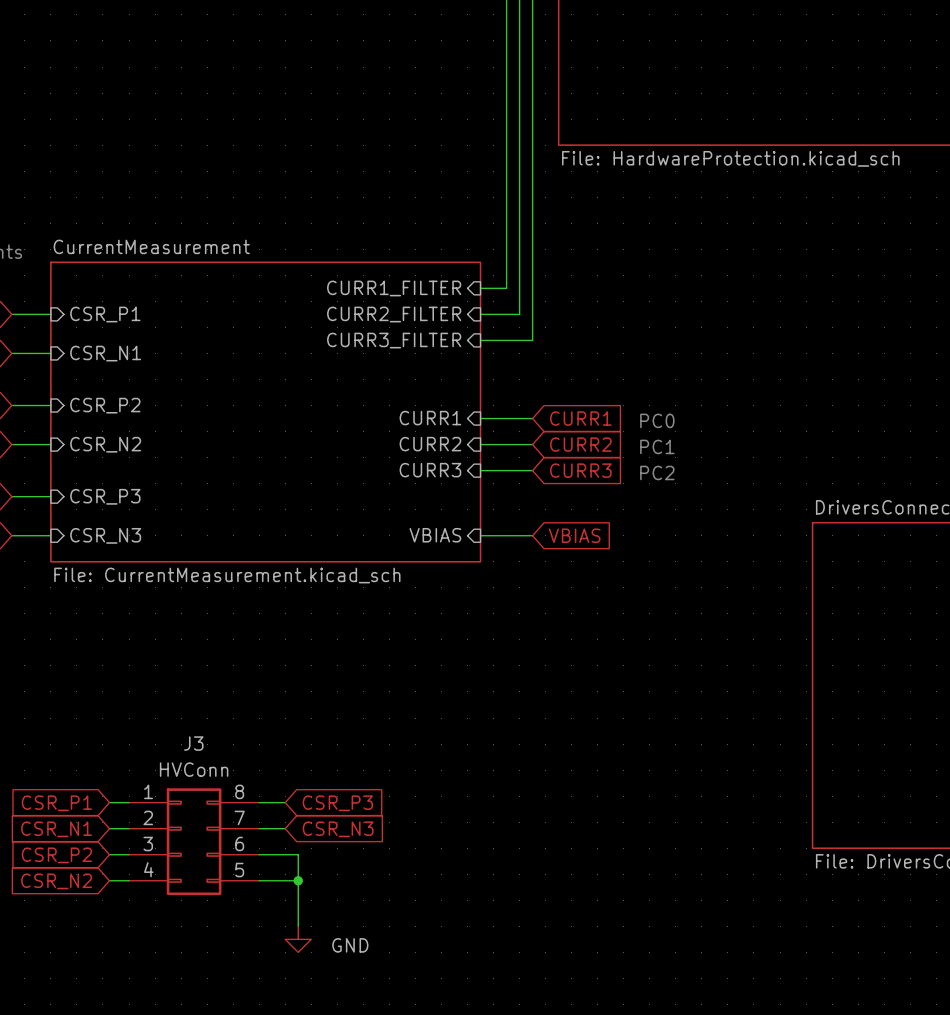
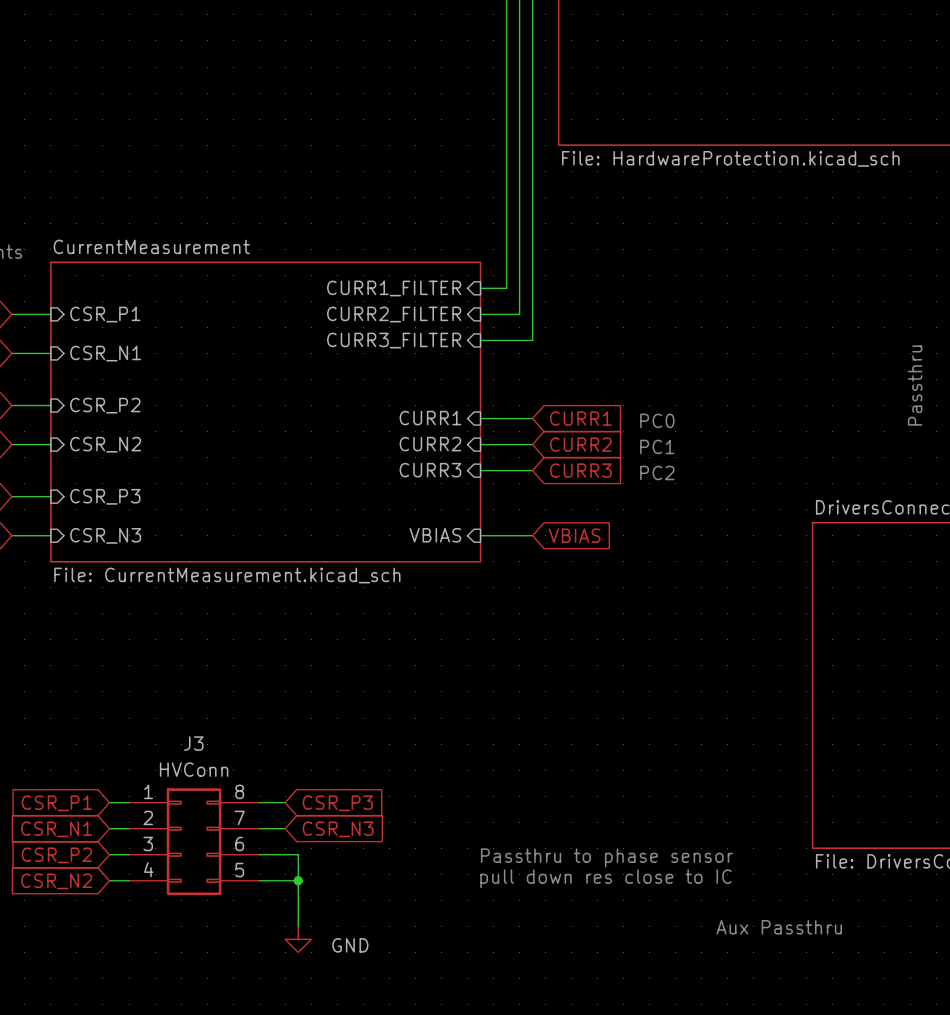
text: none -> Passthru (915, 385)
text: none -> Passthru to phase sensor (606, 857)
text: none -> pull down res close to IC (606, 878)
text: none -> Aux Passthru (779, 927)

